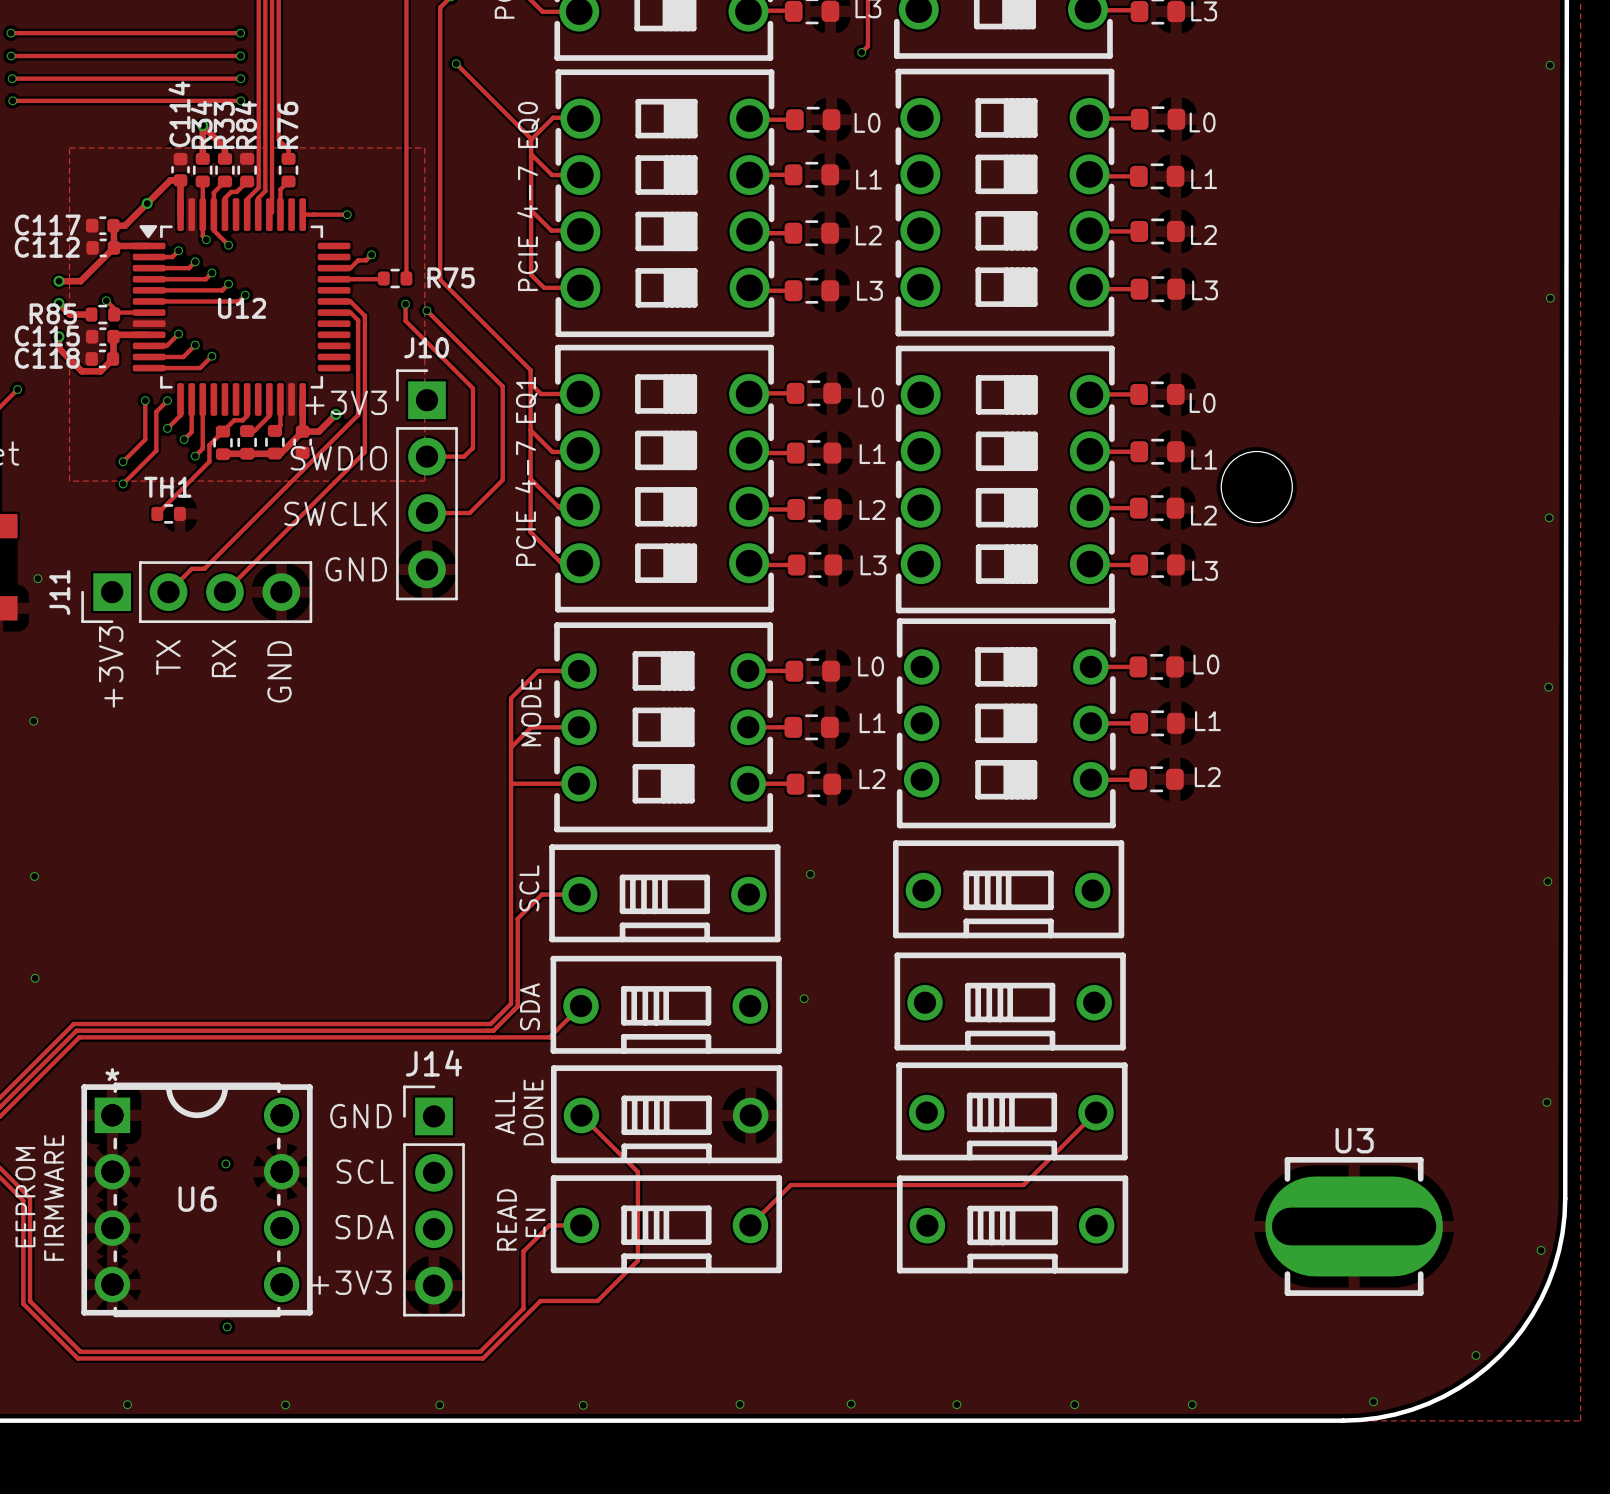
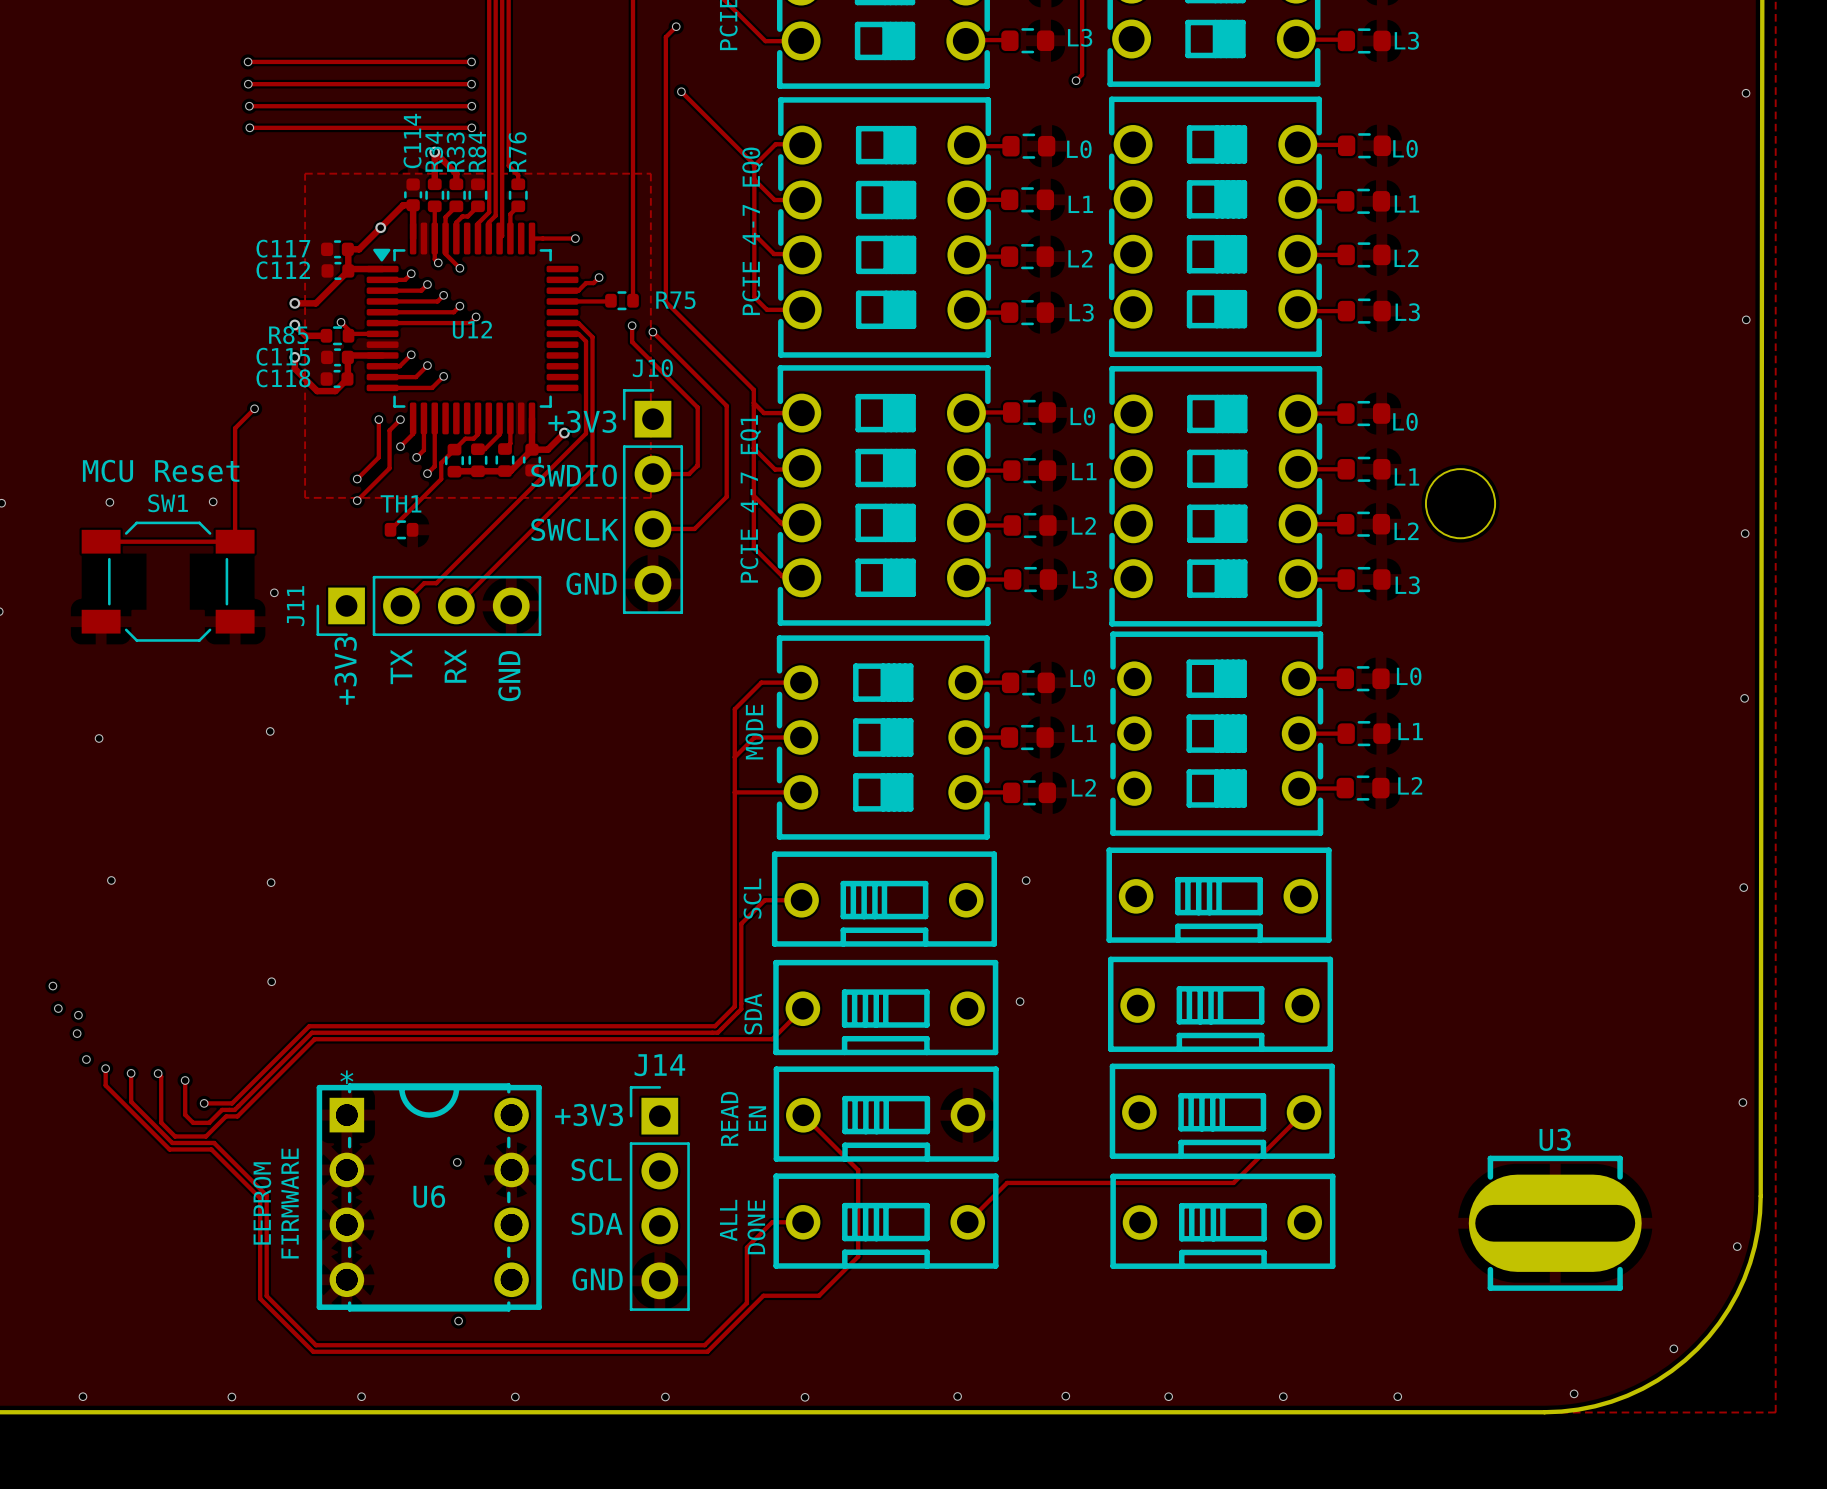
text: ALL (504, 1112) -> READ (729, 1118)
text: DONE (533, 1112) -> EN (757, 1118)
text: GND (360, 1116) -> +3V3 (589, 1115)
text: READ (506, 1219) -> ALL (728, 1220)
text: EN (535, 1222) -> DONE (756, 1227)
text: +3V3 (350, 1282) -> GND (597, 1279)

